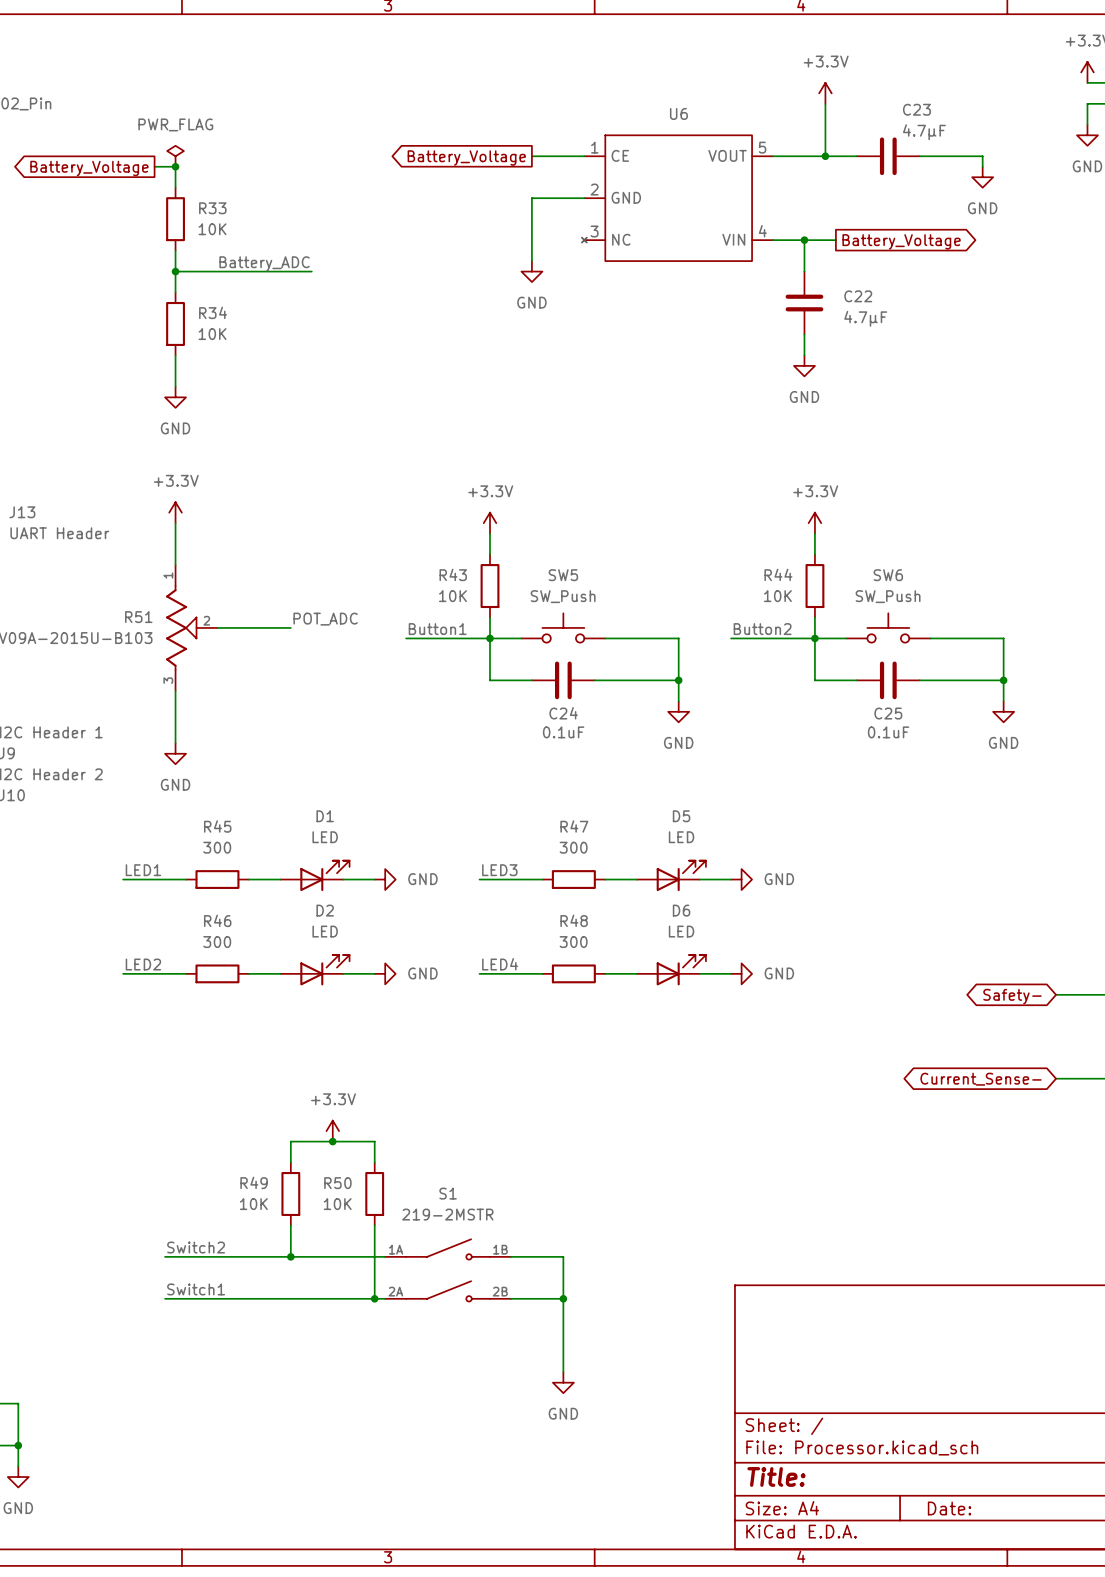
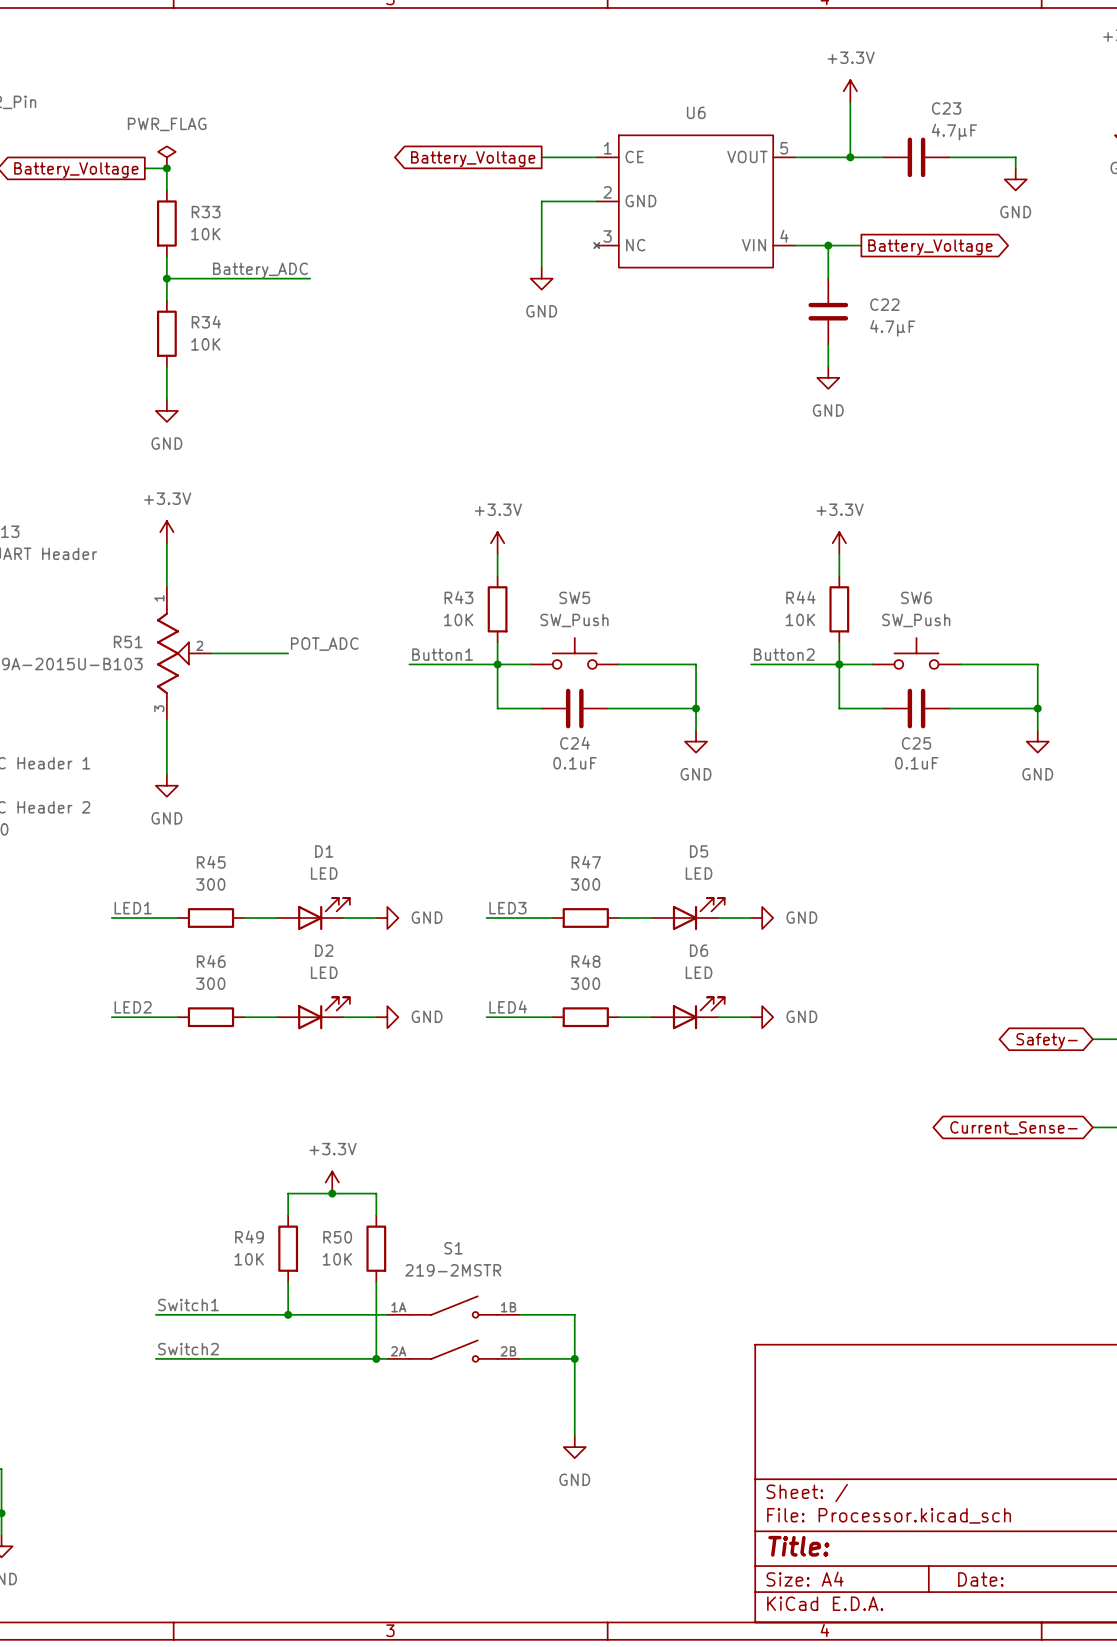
label: Switch2 (196, 1247) -> Switch1 (188, 1305)
label: Switch1 (196, 1289) -> Switch2 (188, 1349)

